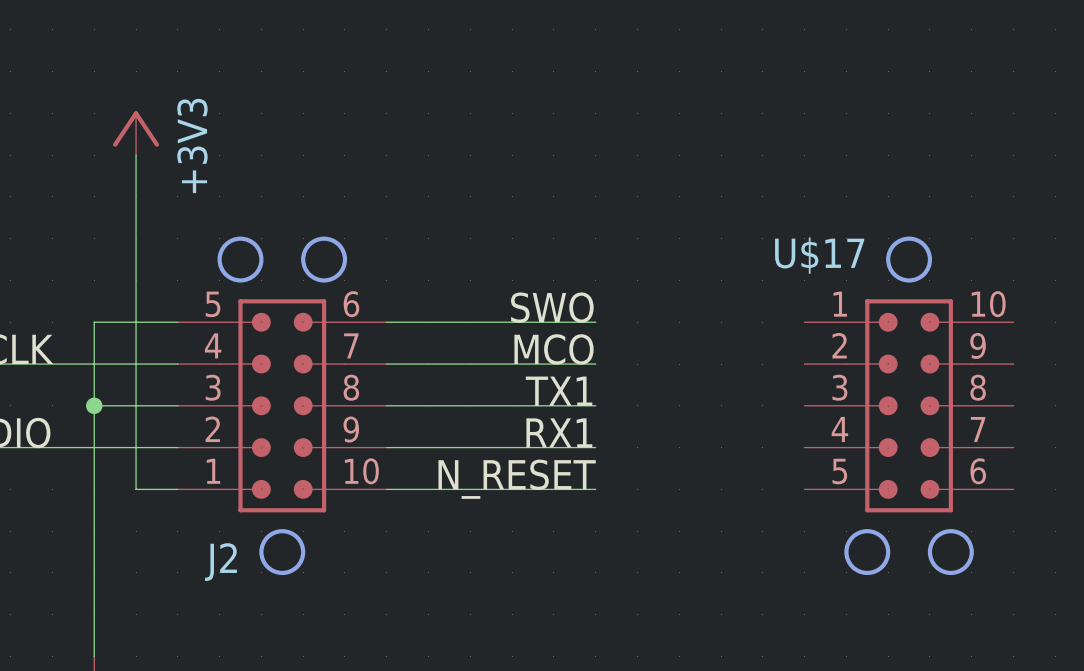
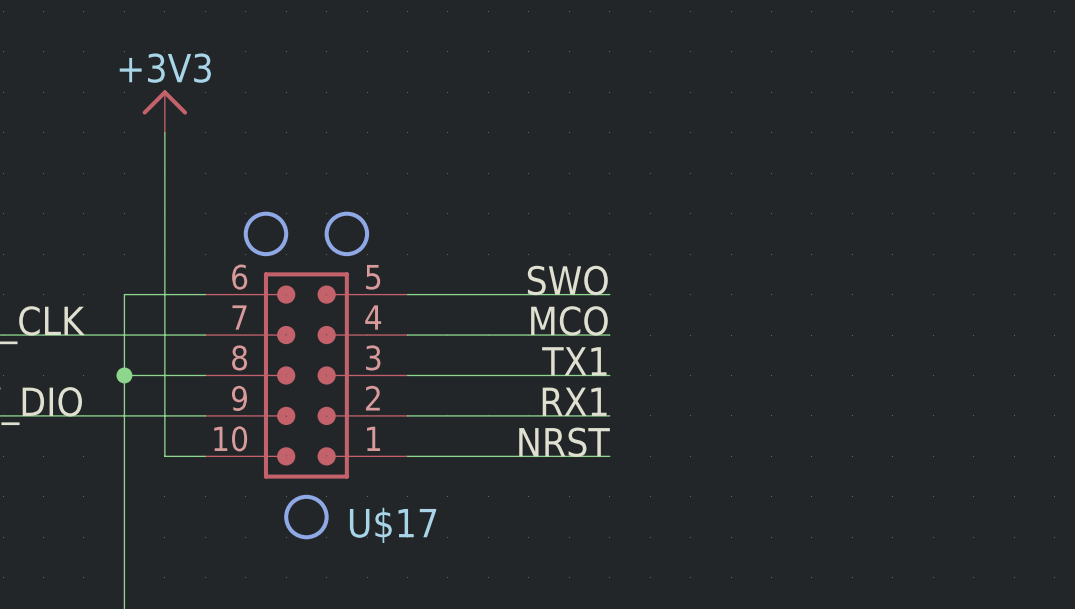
power symbol shape: [113, 111, 160, 156] -> [142, 90, 188, 133]
power symbol text: +3V3 (192, 145) -> none
J2: (282, 405) -> none
U$17 rotation: 0° (909, 405) -> 180° (306, 375)
U$17 position: (909, 405) -> (306, 375)
label: N_RESET (517, 479) -> NRST (564, 442)

